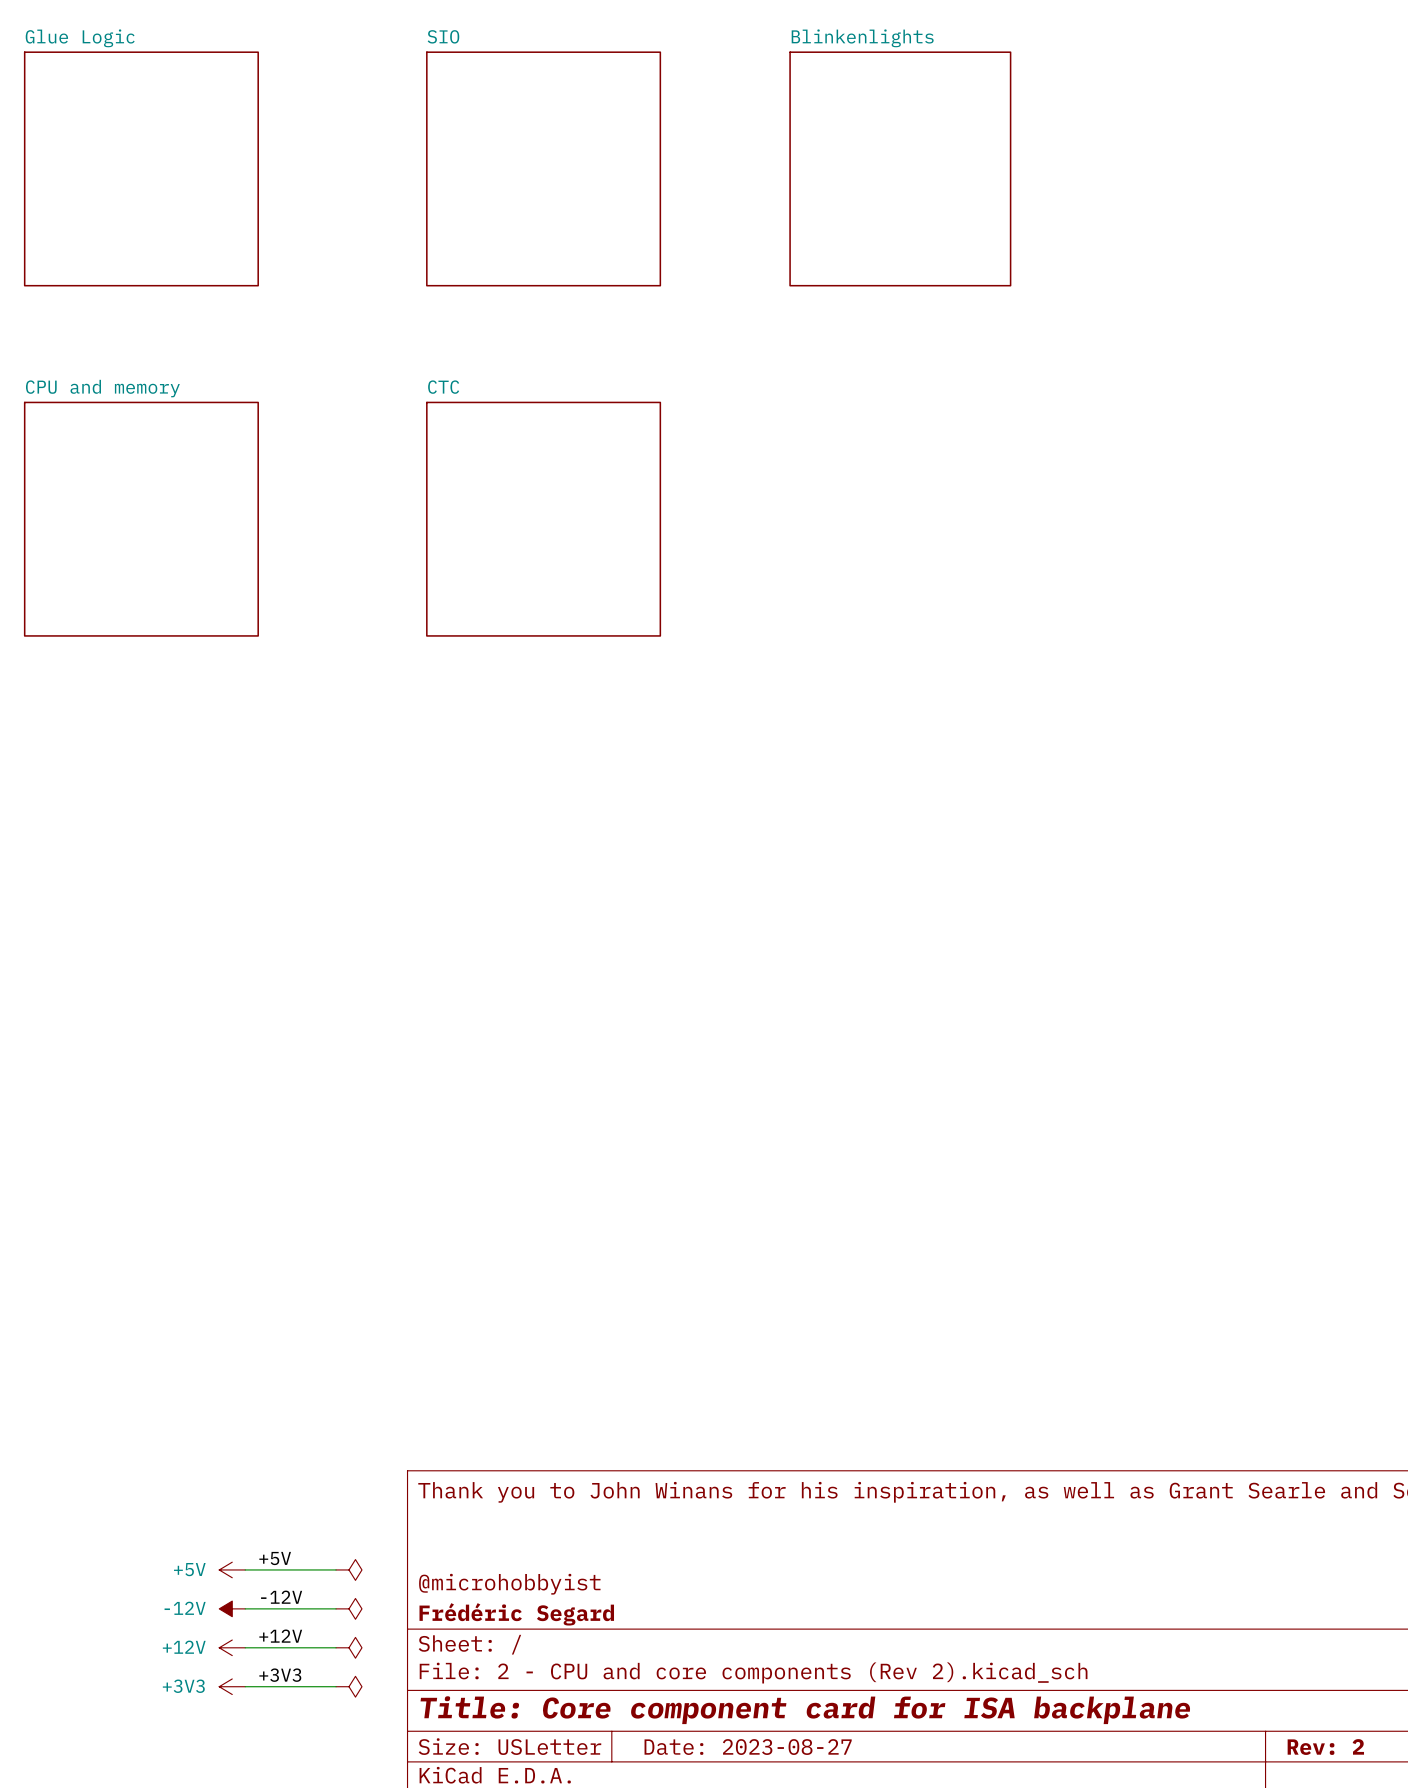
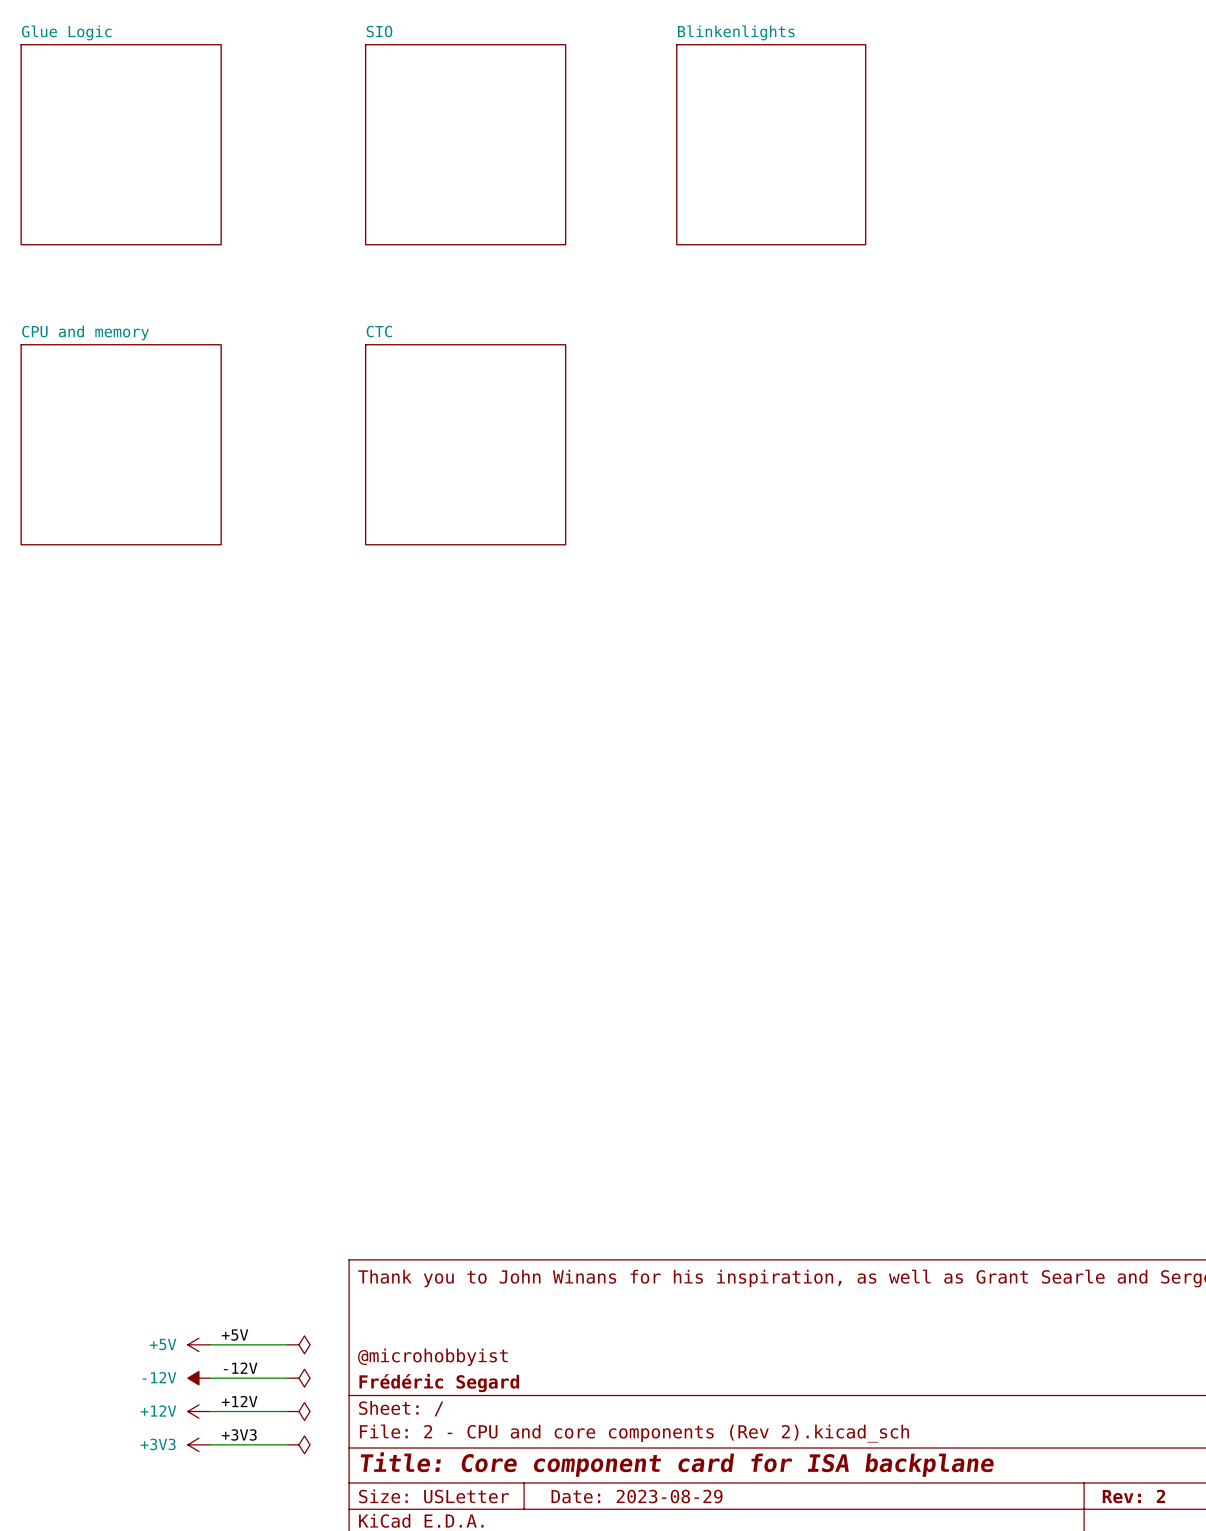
title block: Date: 2023-08-27 (748, 1747) -> Date: 2023-08-29 (637, 1496)

